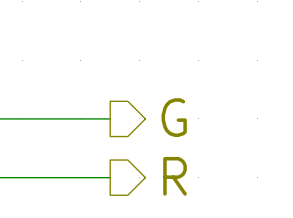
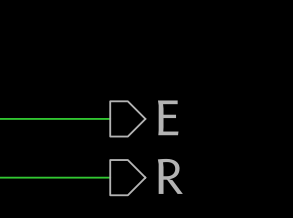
hierarchical label: G (174, 117) -> E (168, 117)

